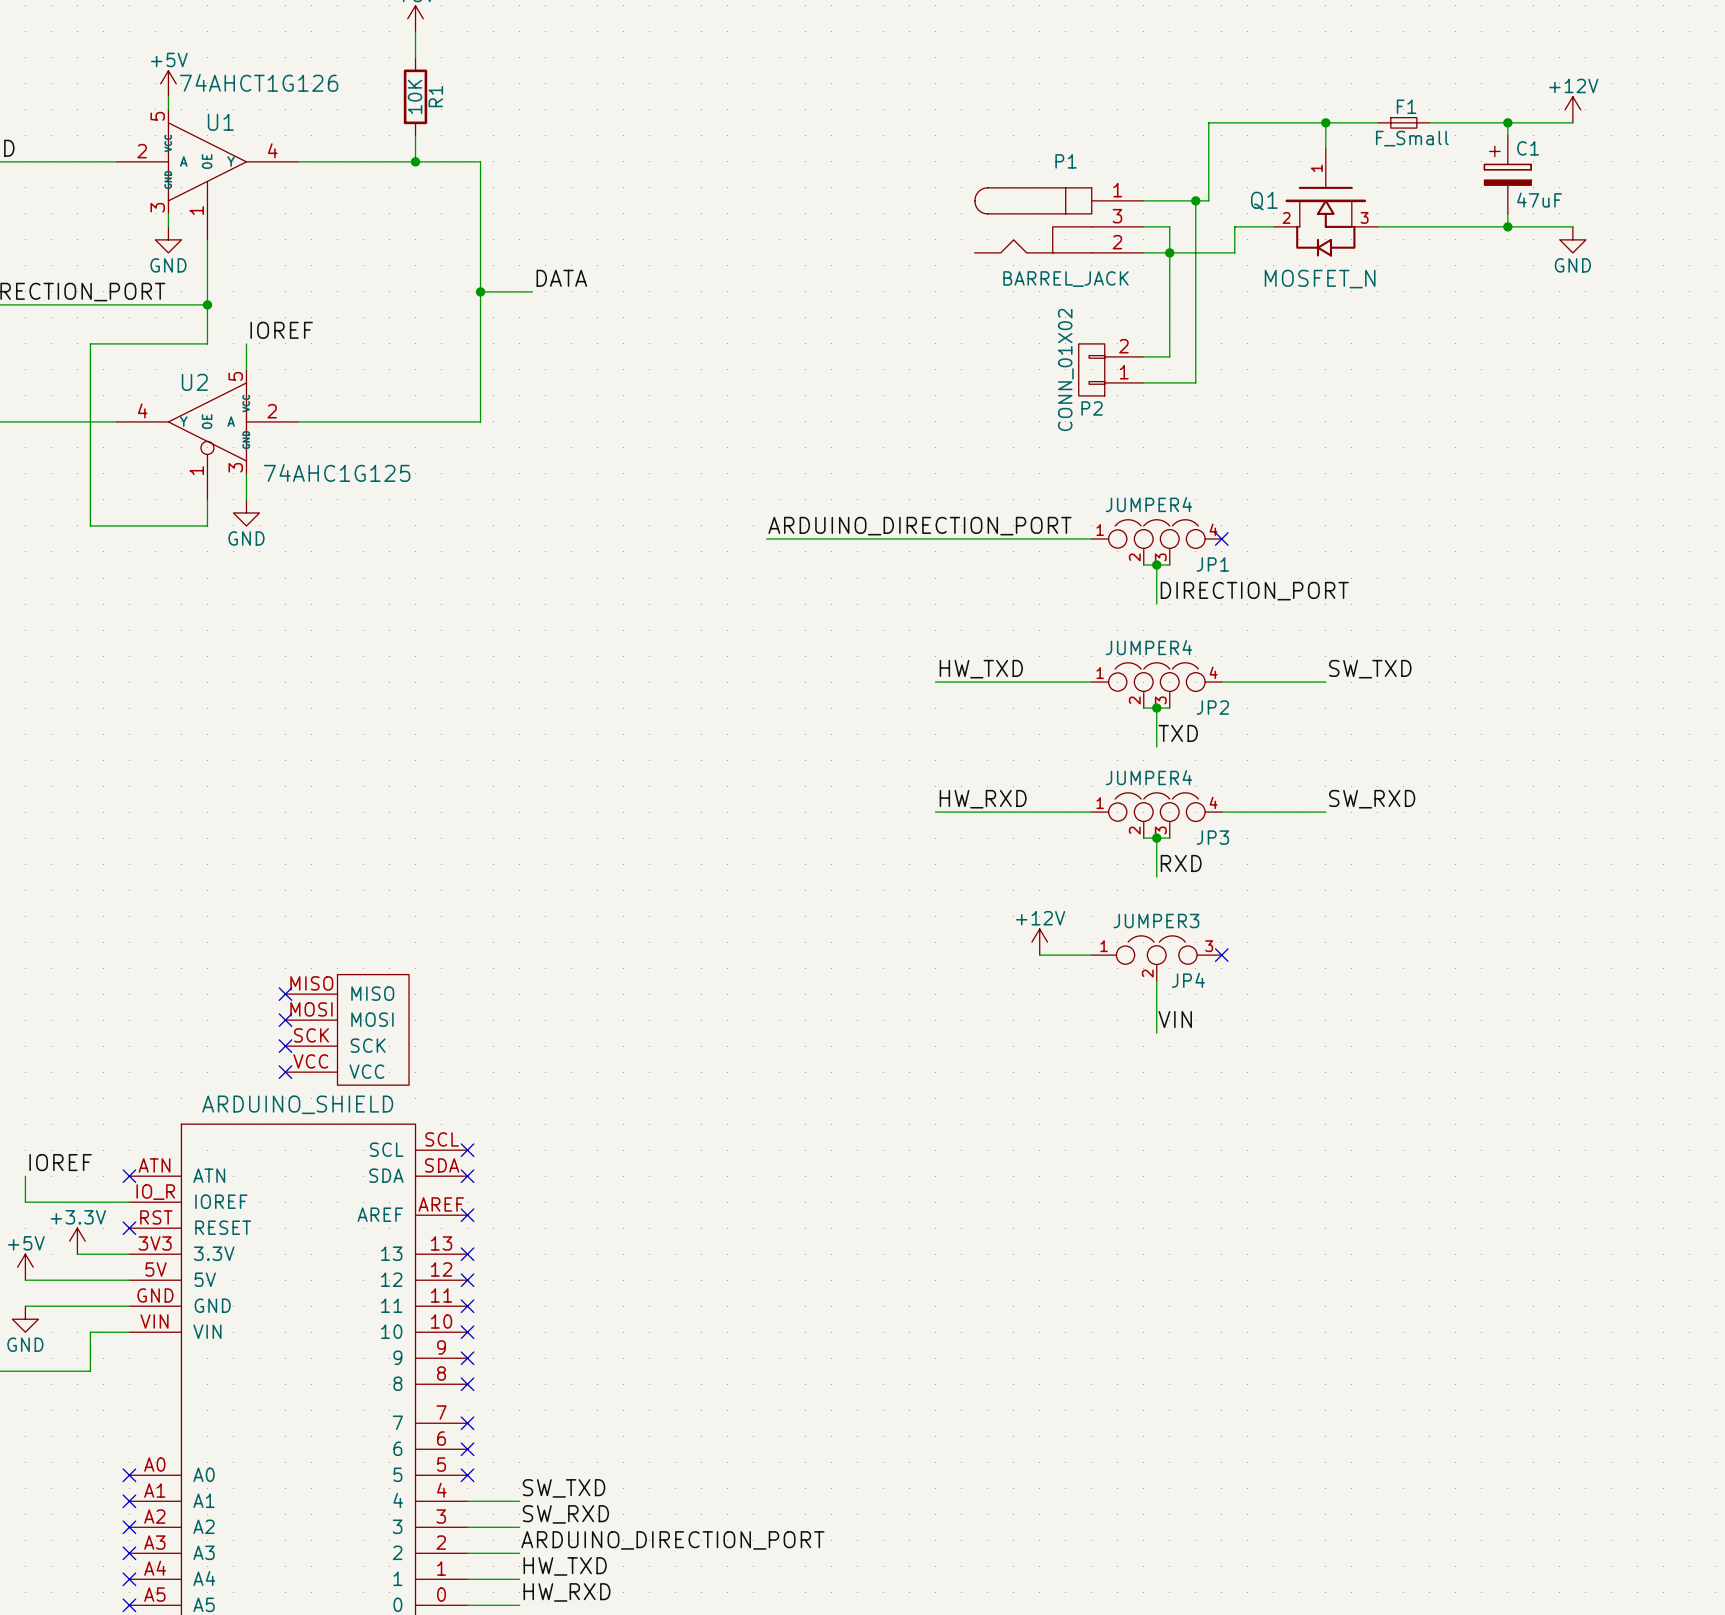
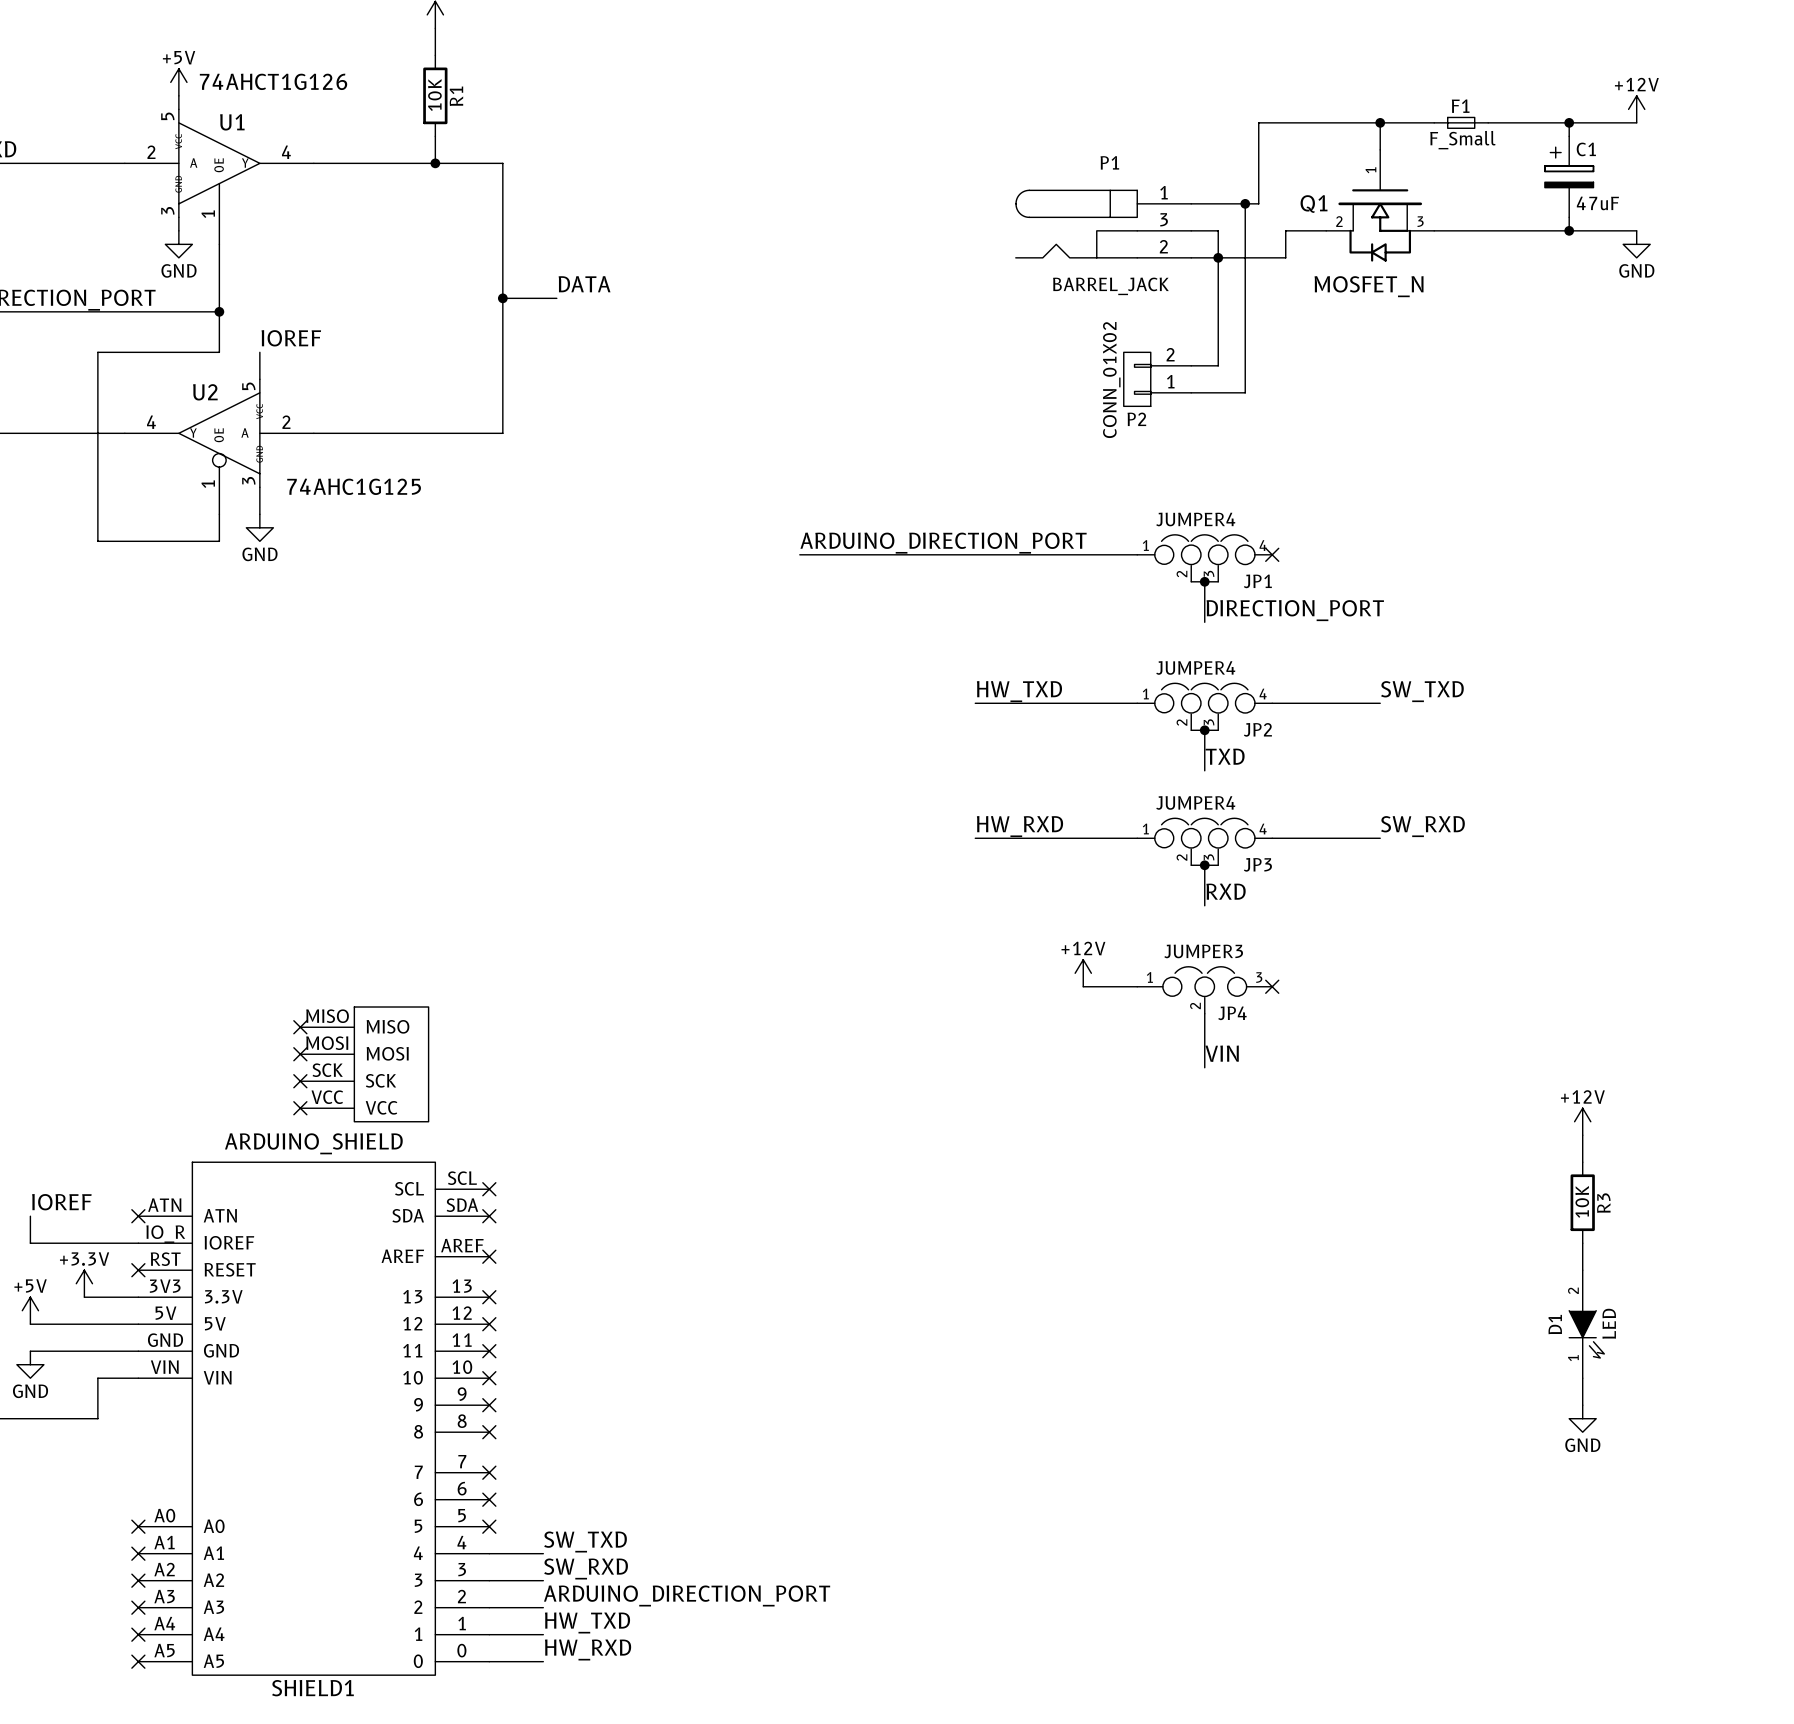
power symbol: none -> +12V (1582, 1121)
wire: none -> (1582, 1135) (1582, 1162)
R3: none -> 10K (1582, 1202)
wire: none -> (1582, 1243) (1582, 1270)
D1: none -> LED (1586, 1324)
wire: none -> (1582, 1378) (1582, 1405)
power symbol: none -> GND (1582, 1418)

